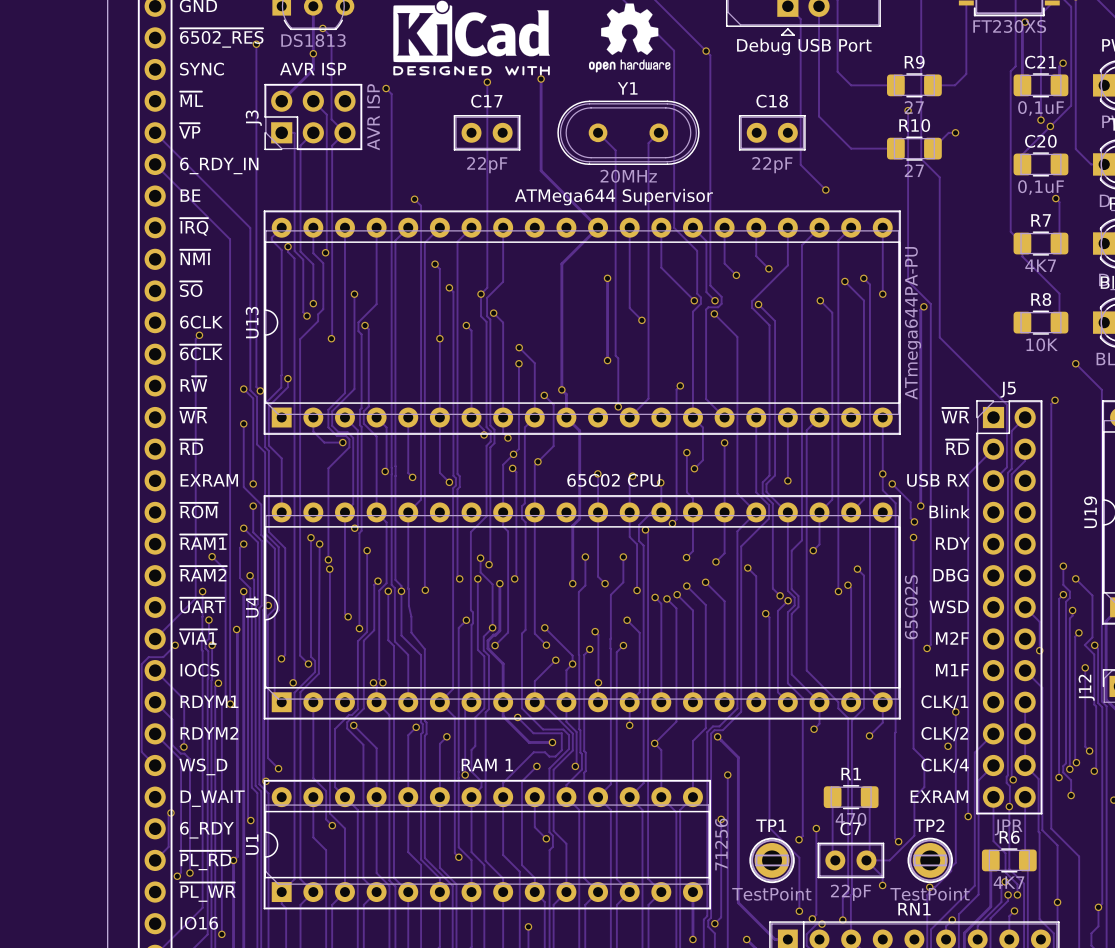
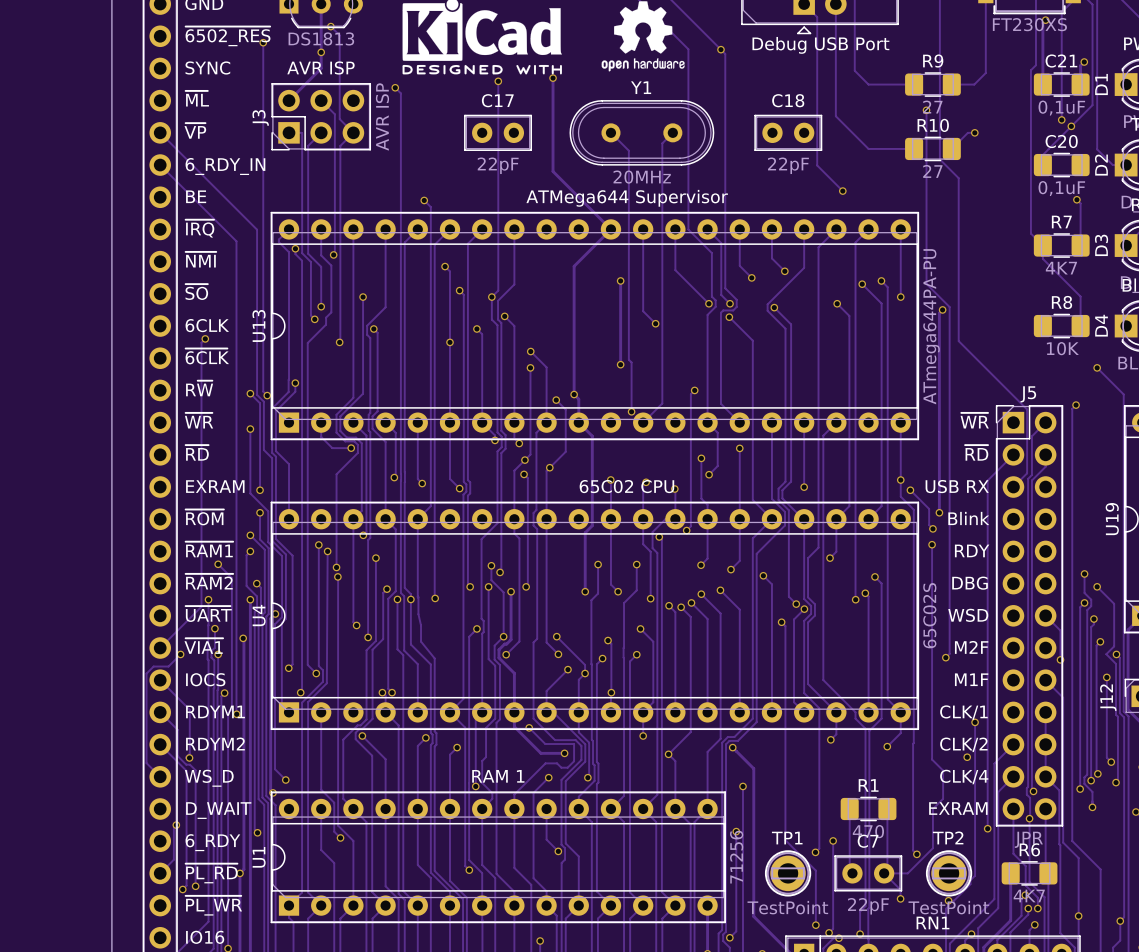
D1 name: none -> D1 (1101, 84)
D2 name: none -> D2 (1101, 165)
D3 name: none -> D3 (1101, 245)
D4 name: none -> D4 (1101, 325)

